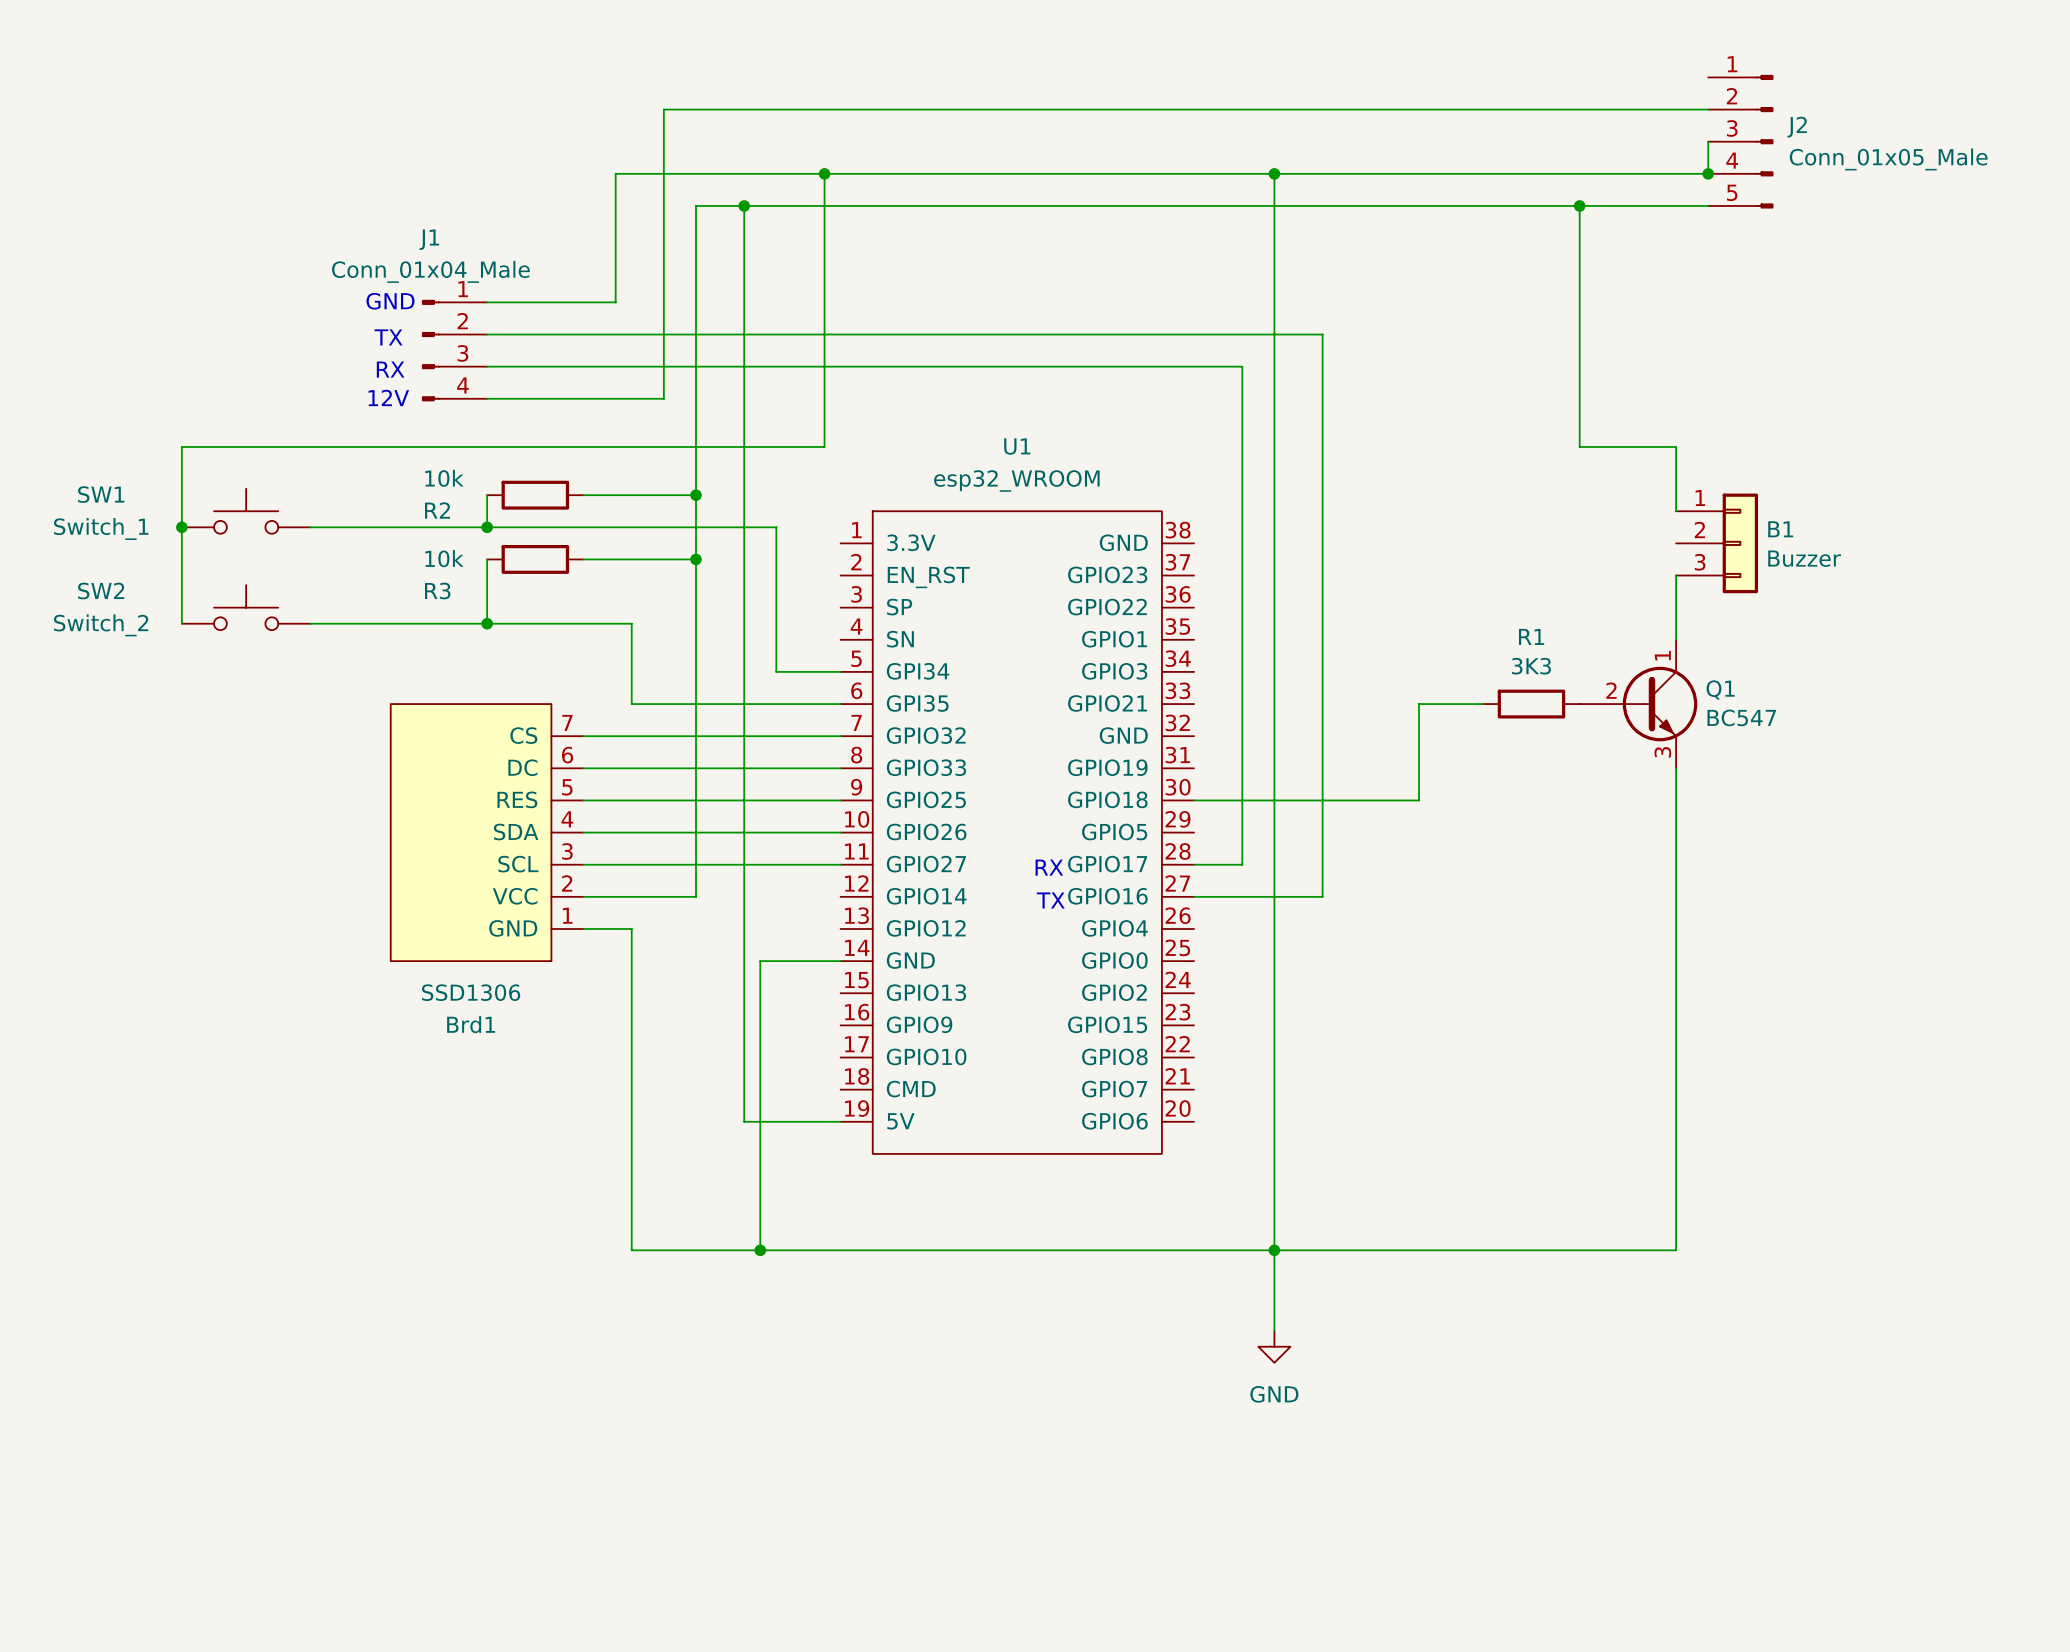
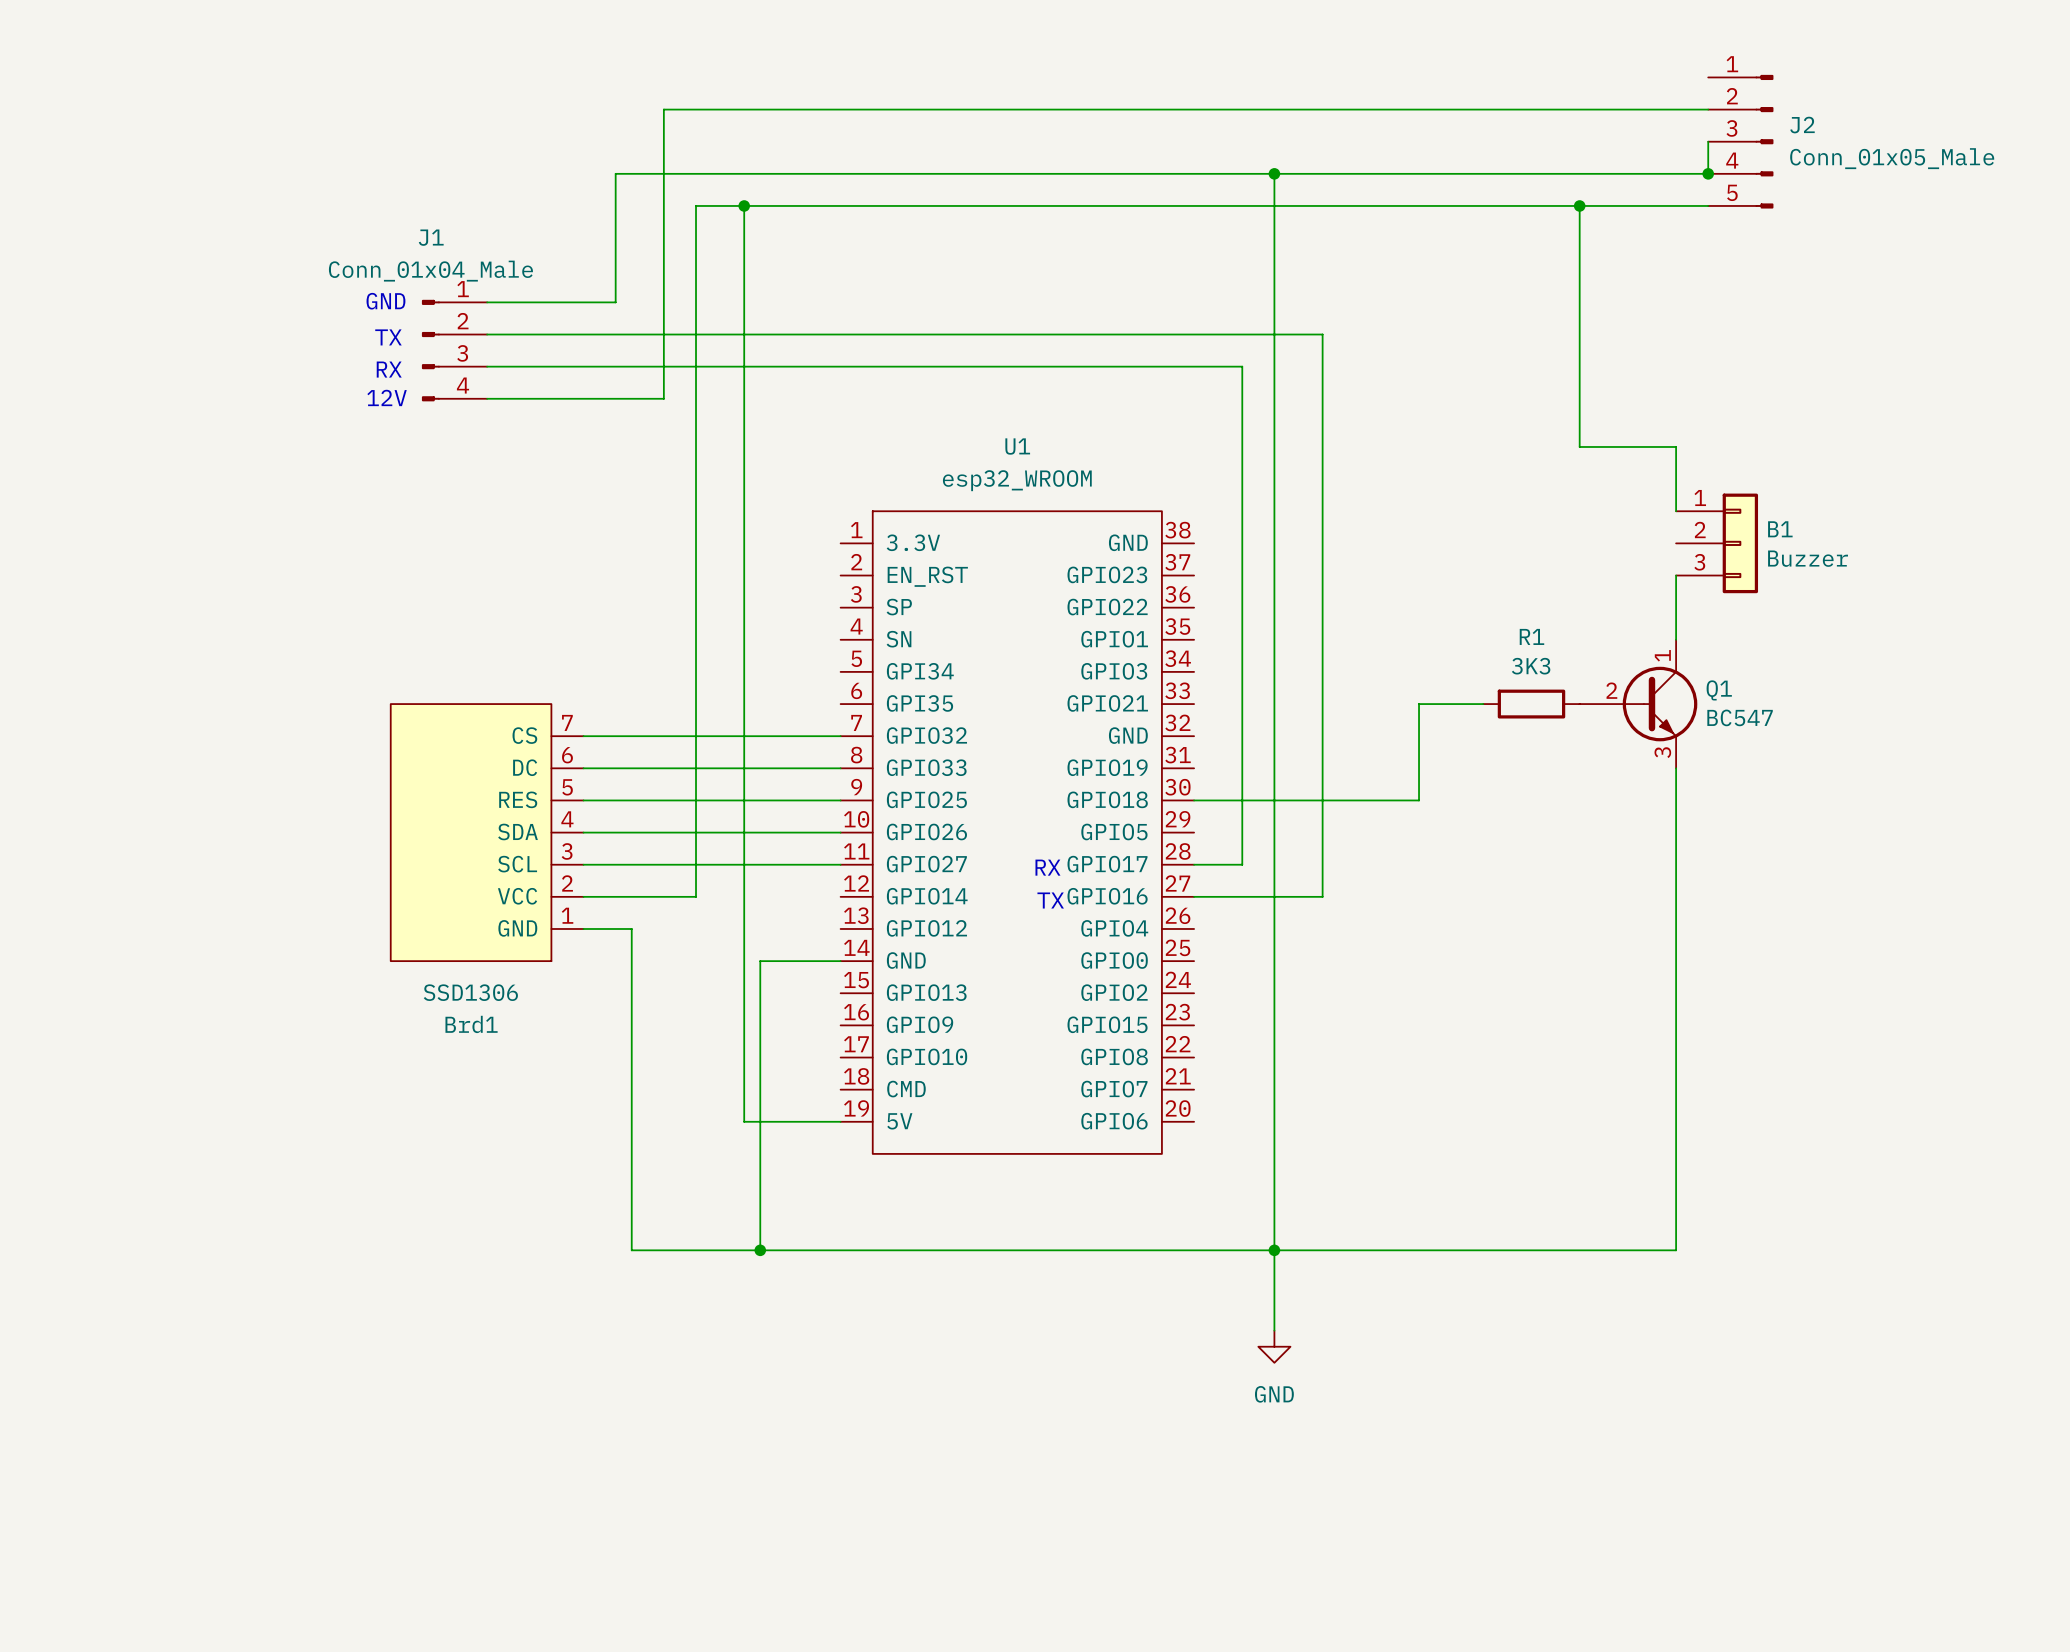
wire: (824, 173) (824, 446) (181, 446) (181, 623) -> none
junction: (824, 173) -> none
wire: (487, 495) (487, 527) -> none
R2: 10k (535, 495) -> none
wire: (583, 495) (696, 495) -> none
junction: (696, 495) -> none
SW1: Switch_1 (246, 511) -> none
junction: (181, 527) -> none
wire: (310, 527) (776, 527) (776, 671) (840, 671) -> none
junction: (487, 527) -> none
wire: (487, 559) (487, 623) -> none
R3: 10k (535, 559) -> none
wire: (583, 559) (696, 559) -> none
junction: (696, 559) -> none
SW2: Switch_2 (246, 607) -> none
wire: (310, 623) (631, 623) (631, 704) (840, 704) -> none
junction: (487, 623) -> none

